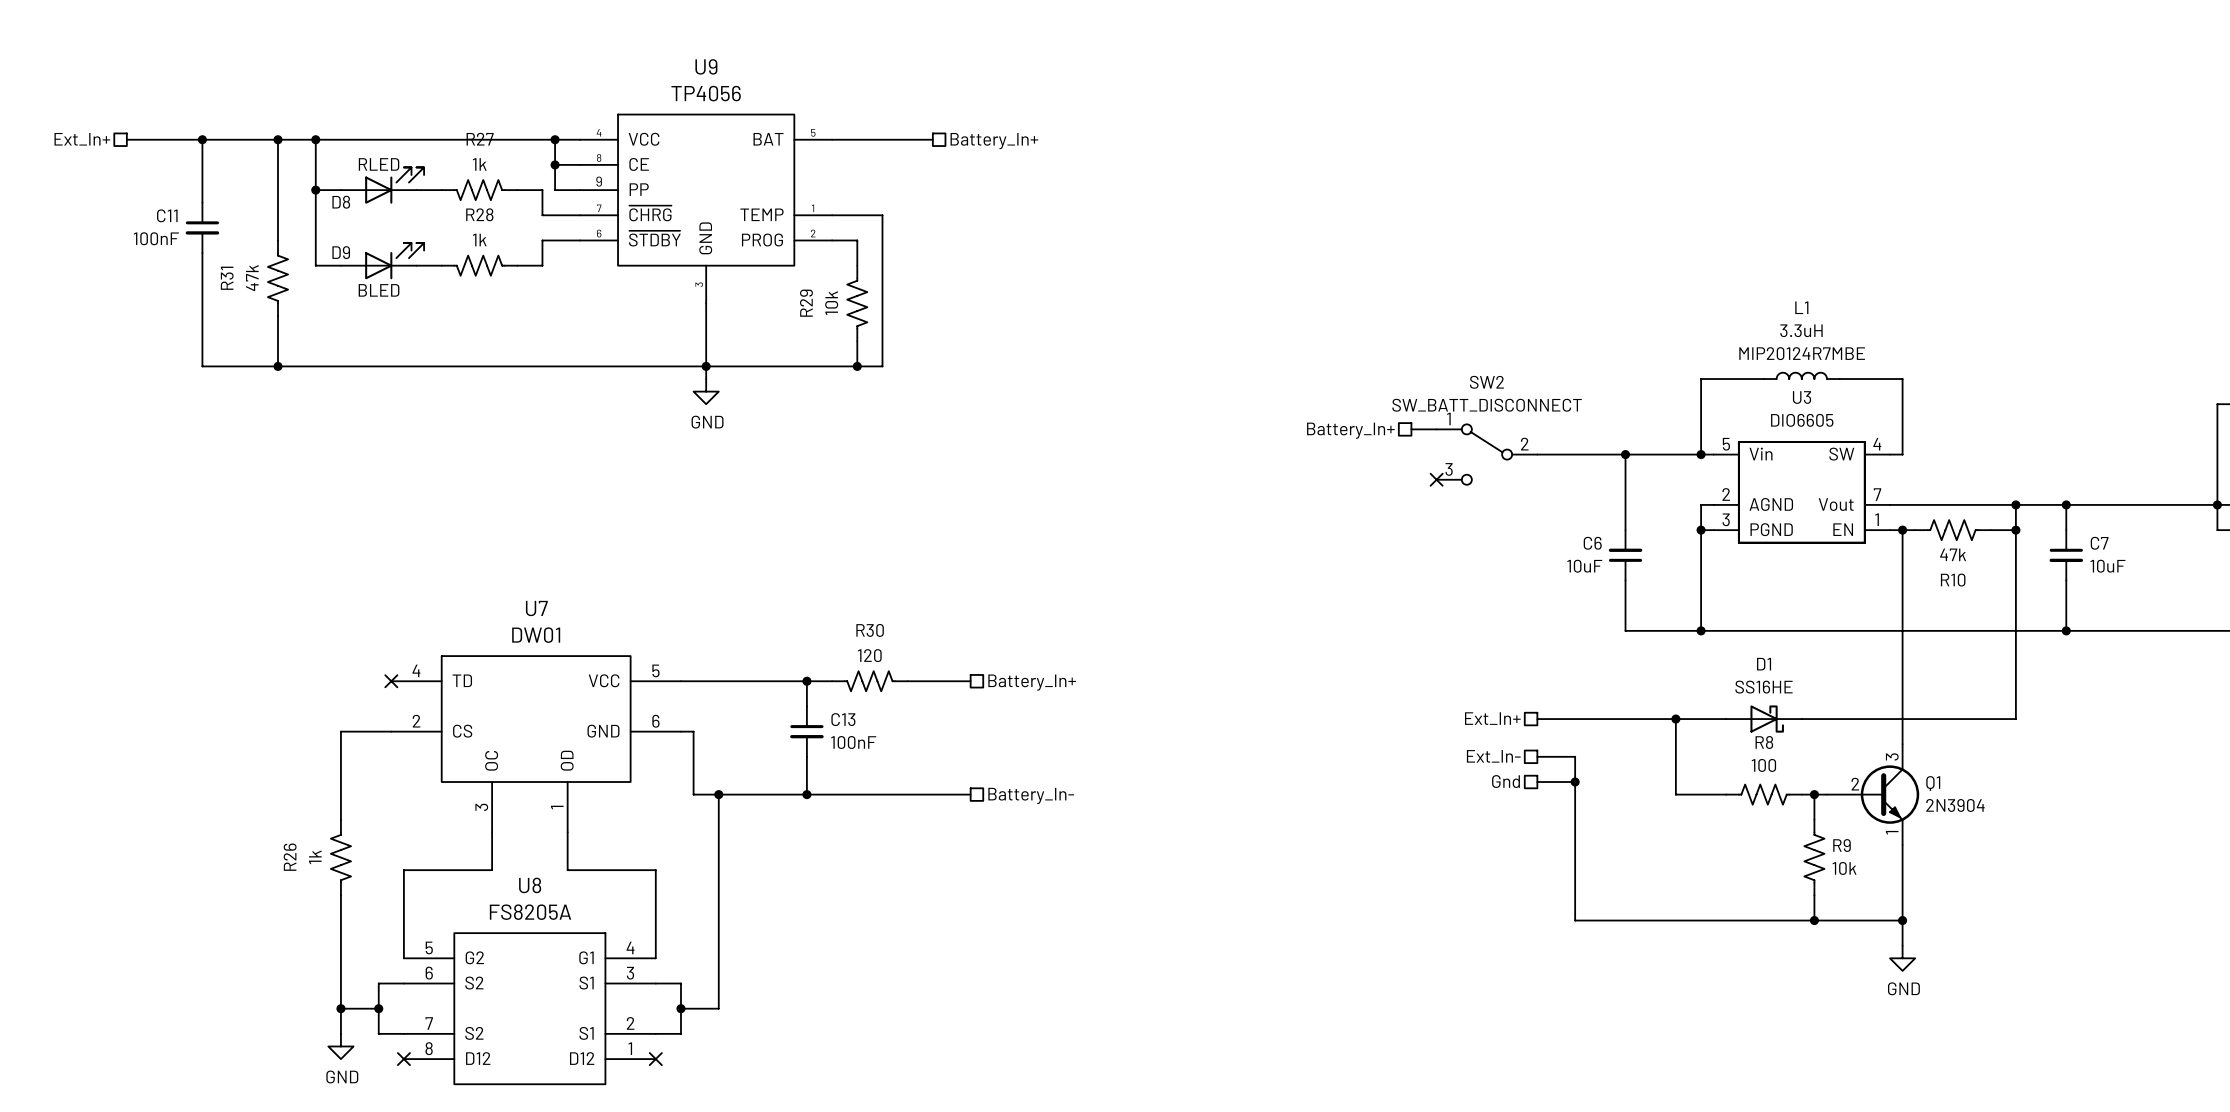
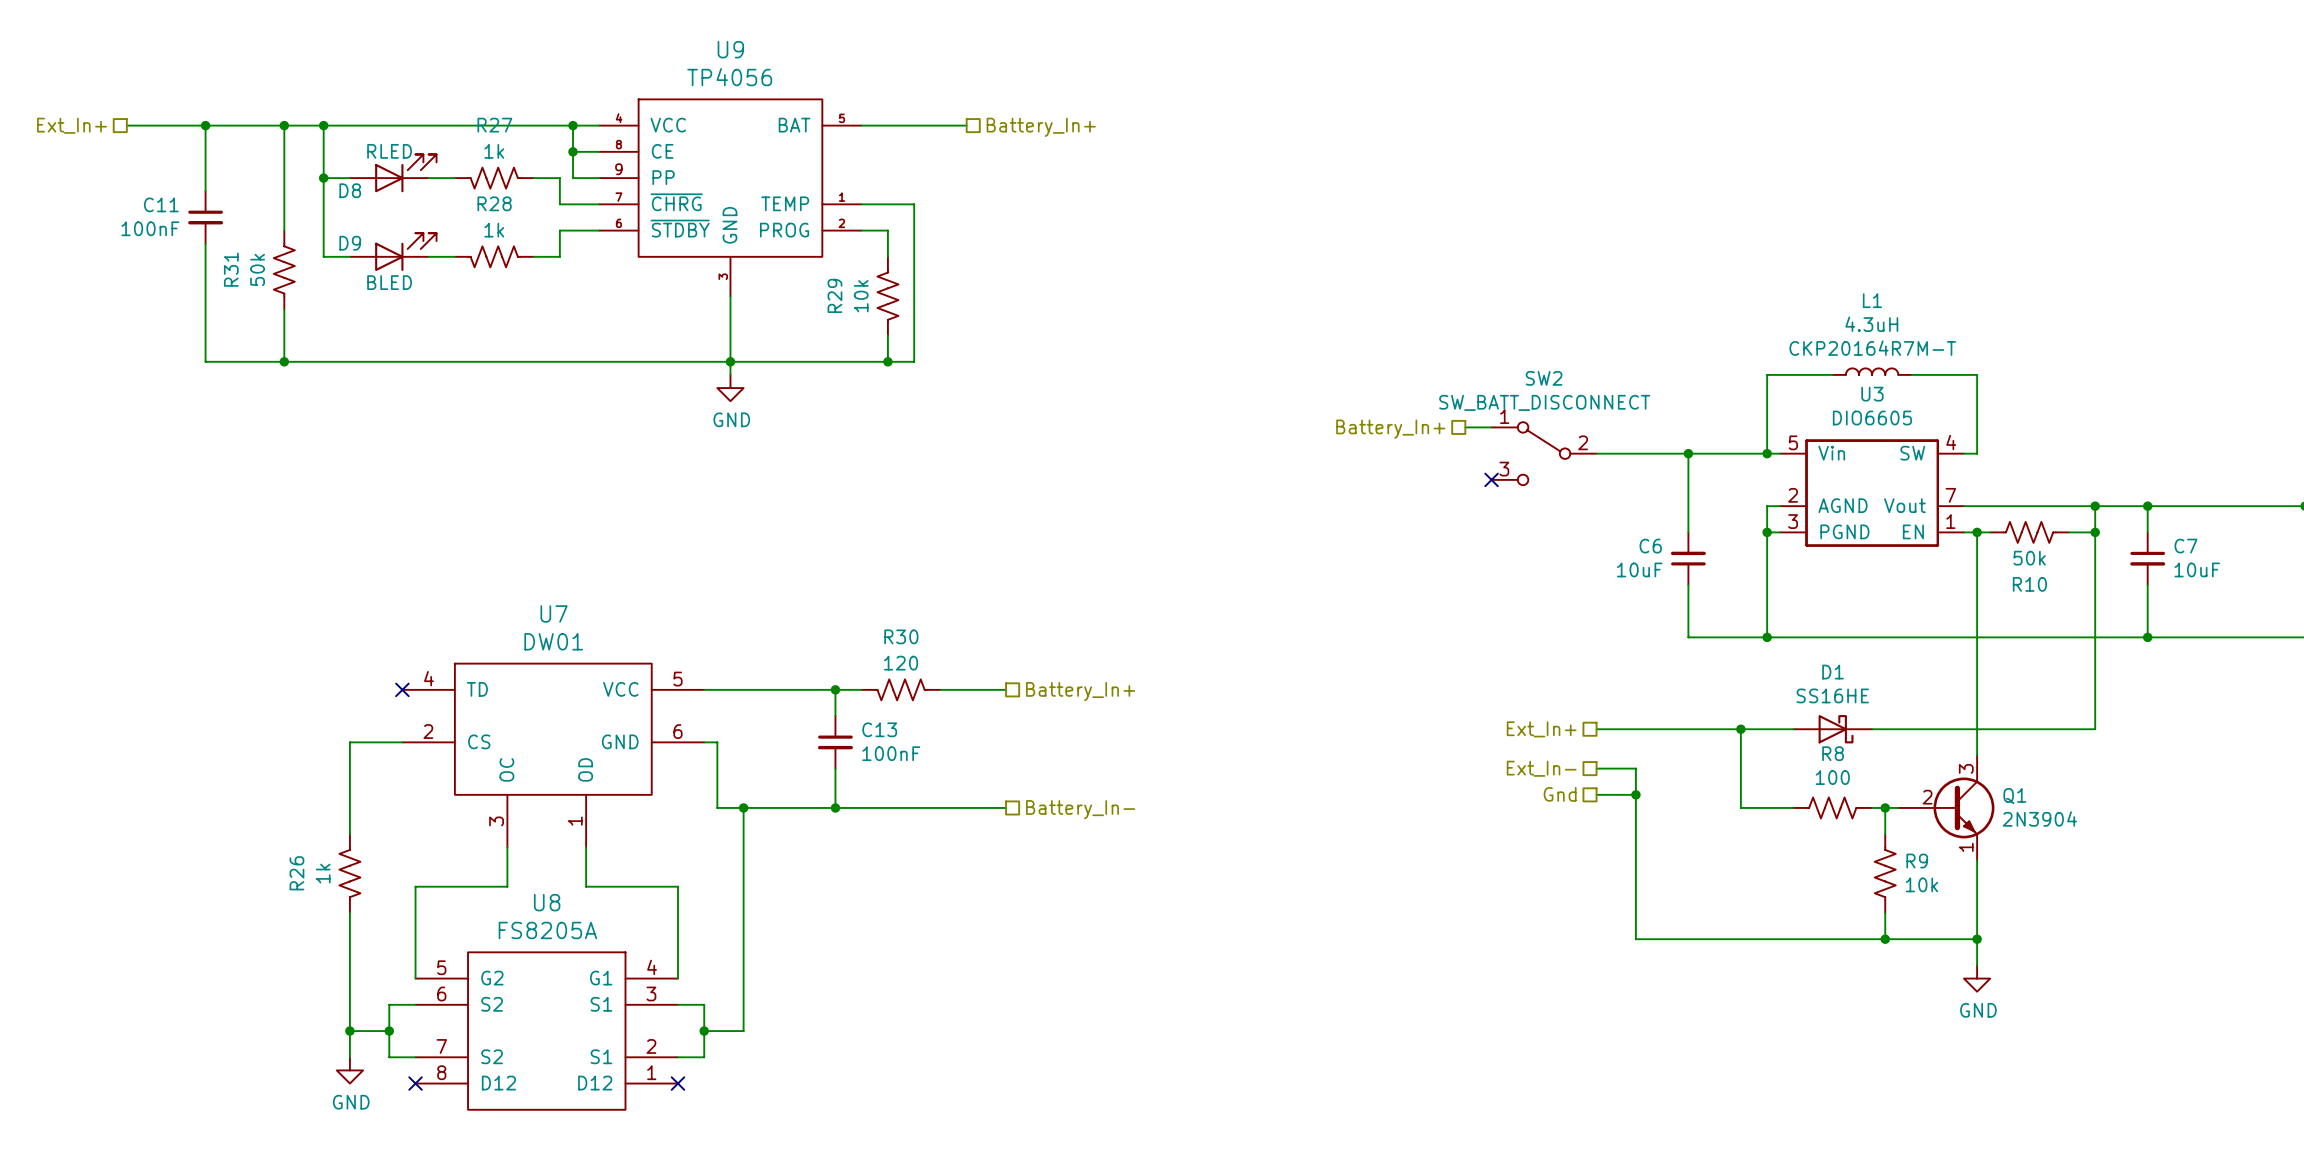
R31 value: 47k (252, 278) -> 50k (257, 269)
L1 value: 3.3uH (1801, 330) -> 4.3uH (1871, 324)
L1 text: MIP20124R7MBE (1802, 353) -> CKP20164R7M-T (1872, 348)
R10 value: 47k (1953, 554) -> 50k (2029, 558)

